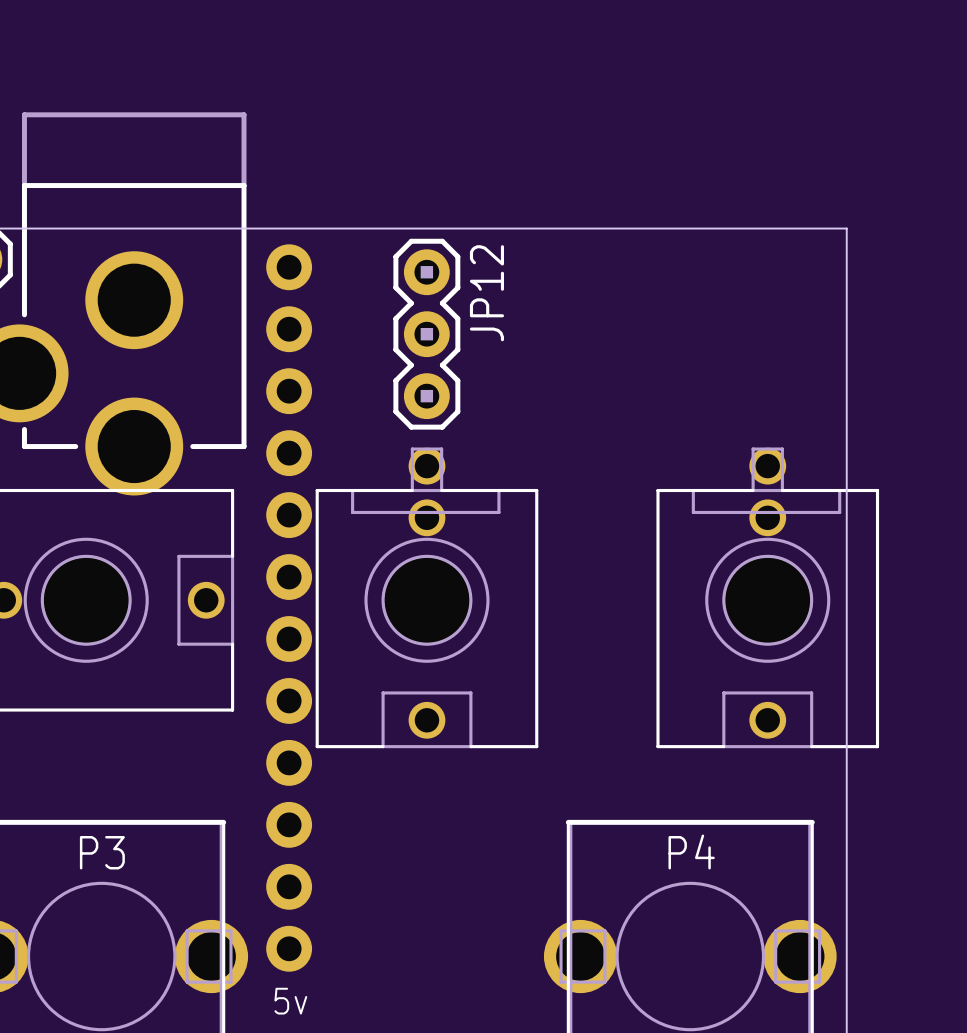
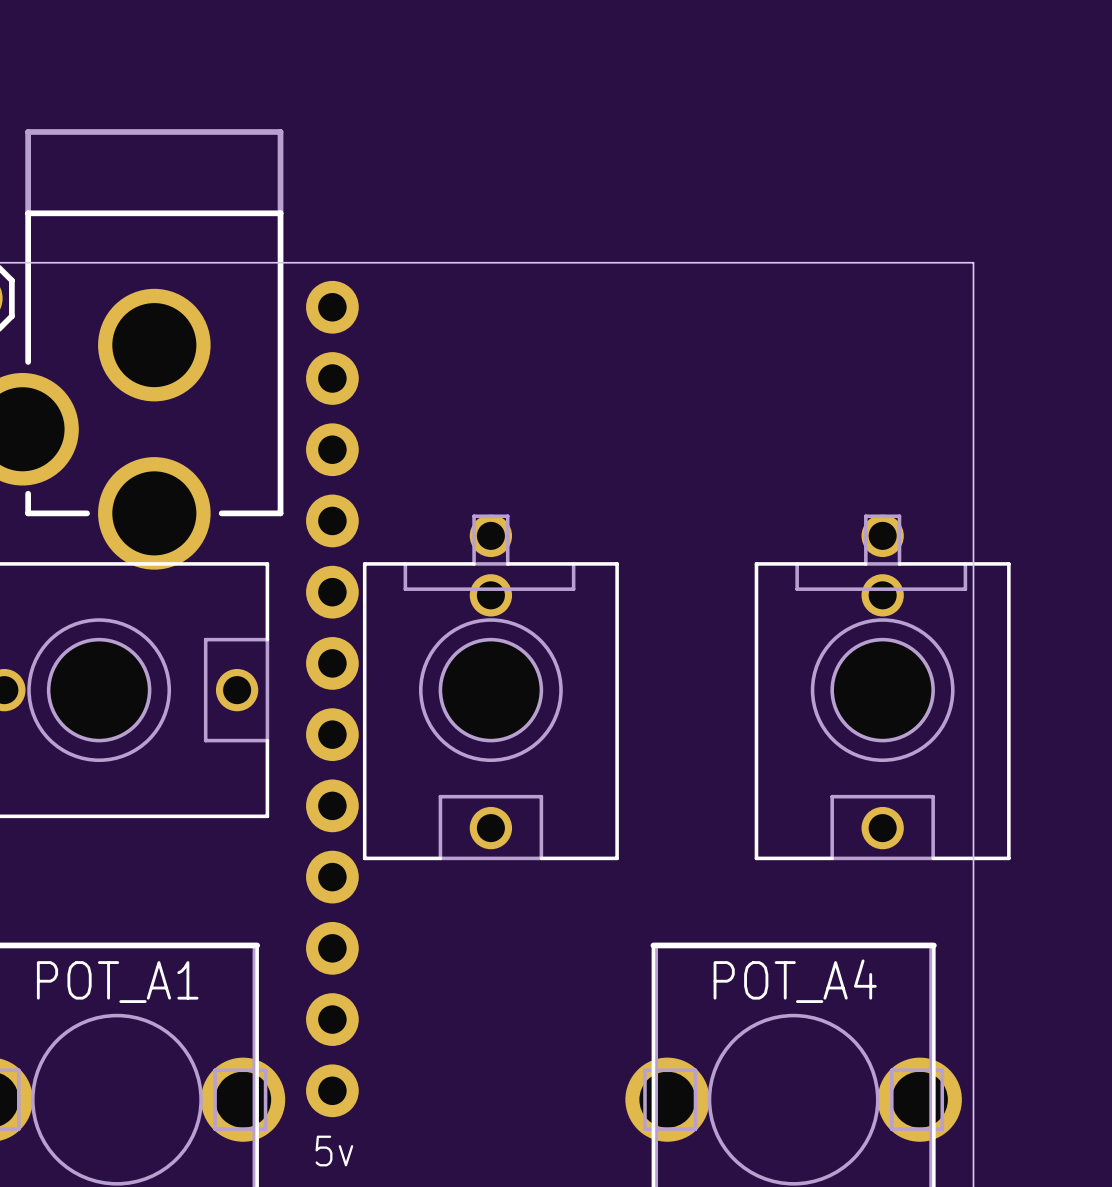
JP12: (426, 334) -> none
P4 name: P4 (691, 851) -> POT_A4 (795, 981)
P3 name: P3 (102, 852) -> POT_A1 (117, 982)

